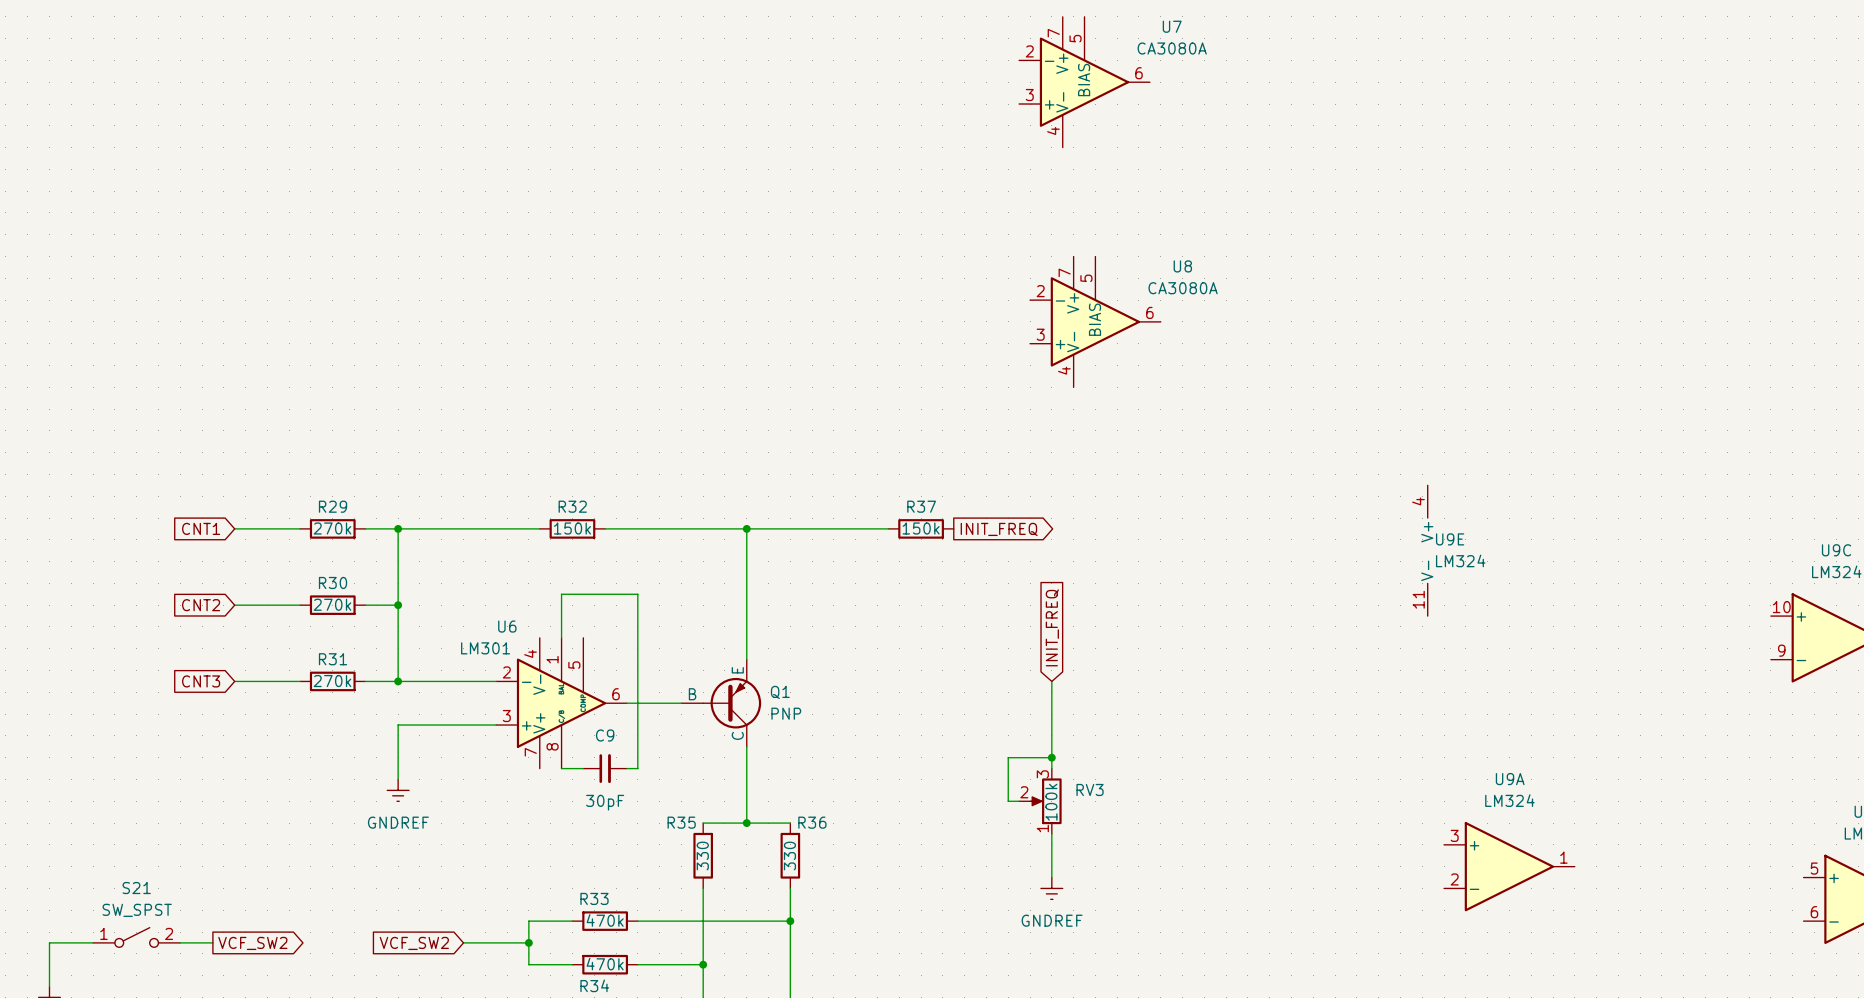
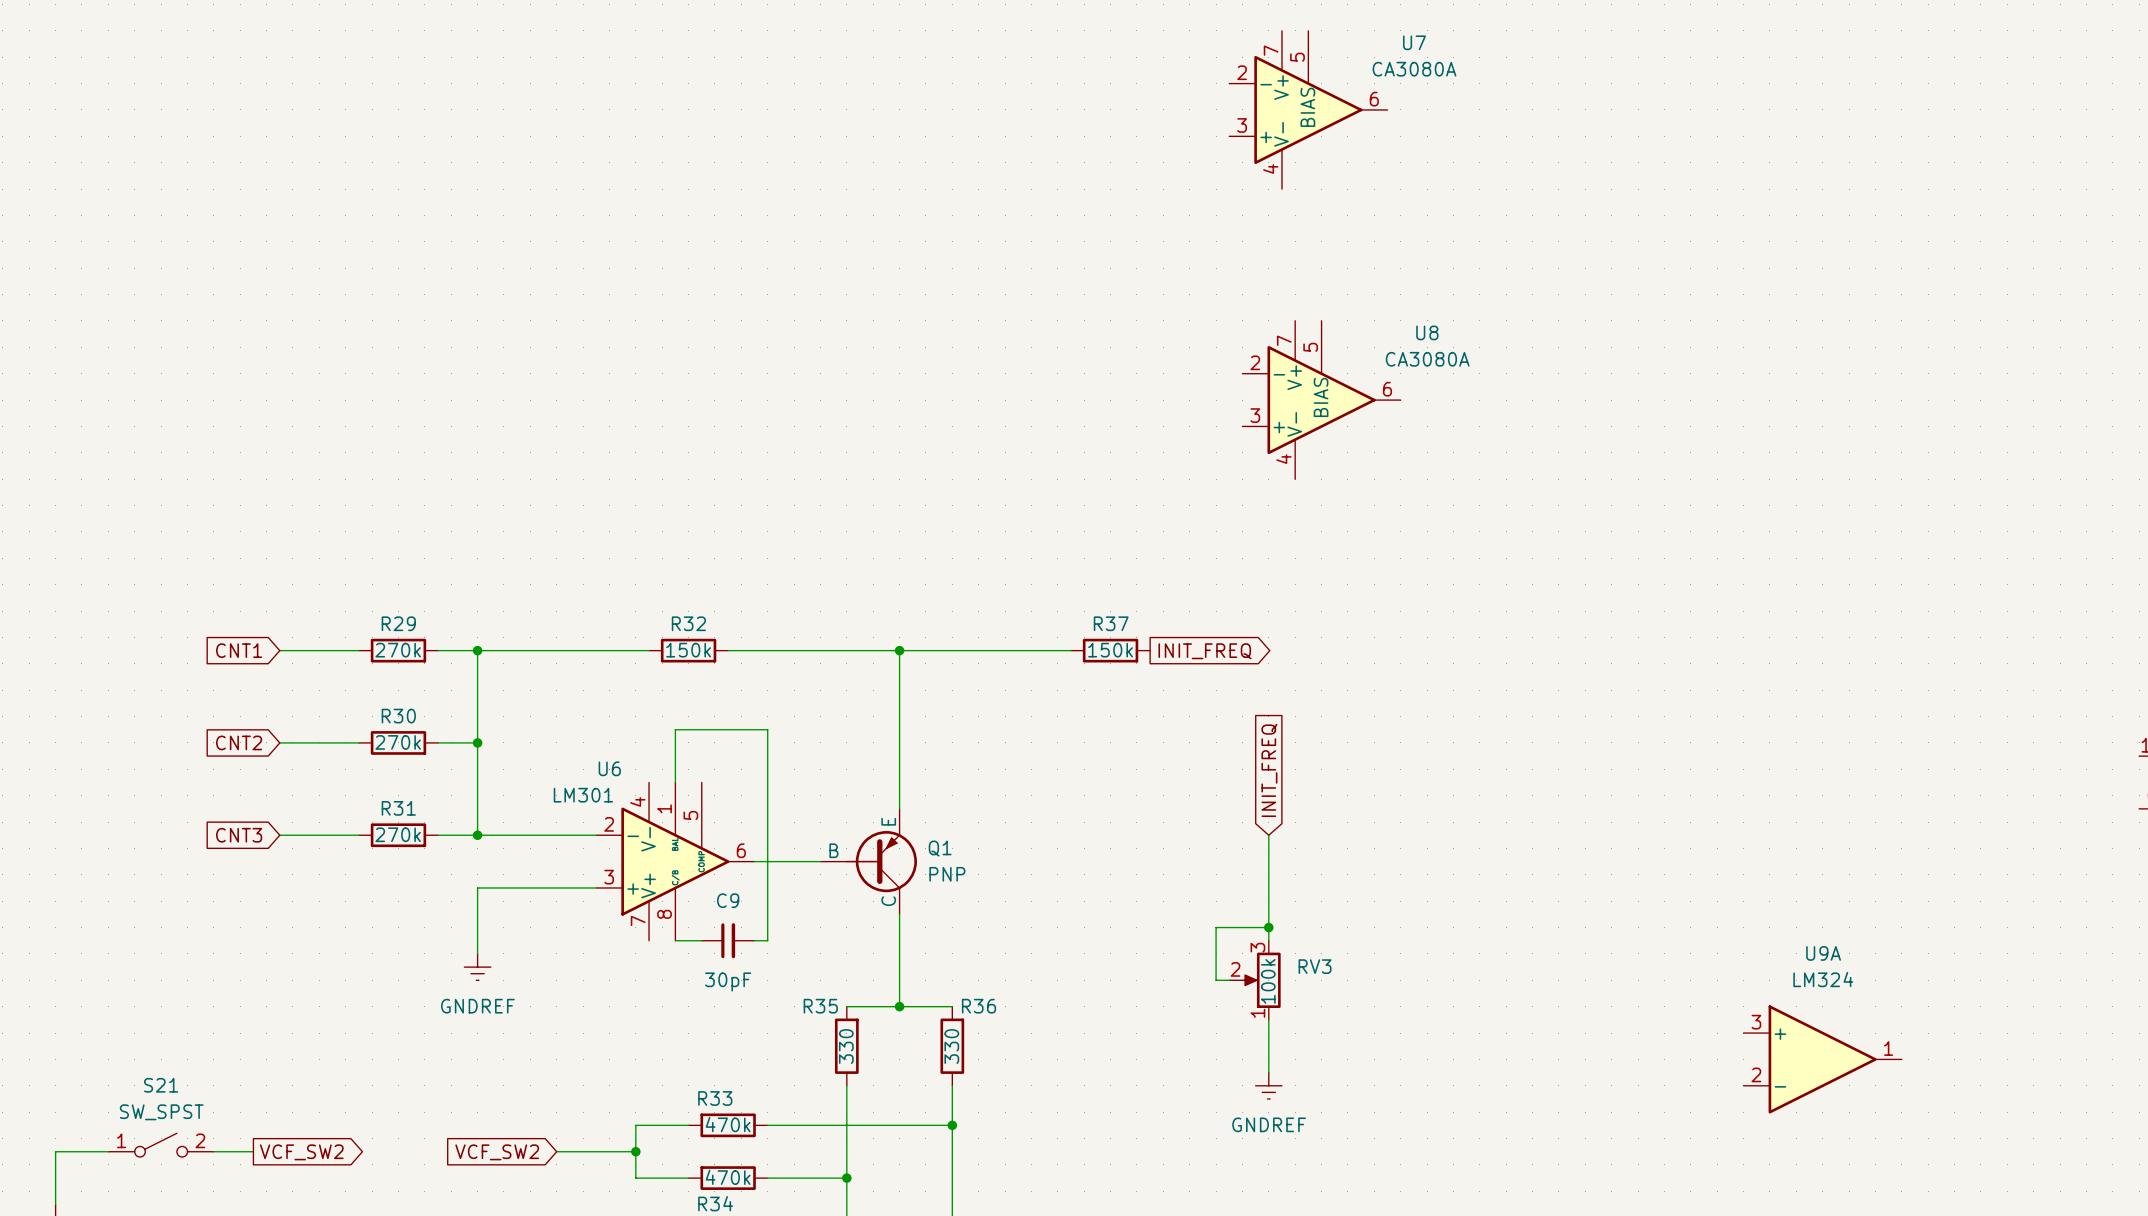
U9E: LM324 (1427, 550) -> none

